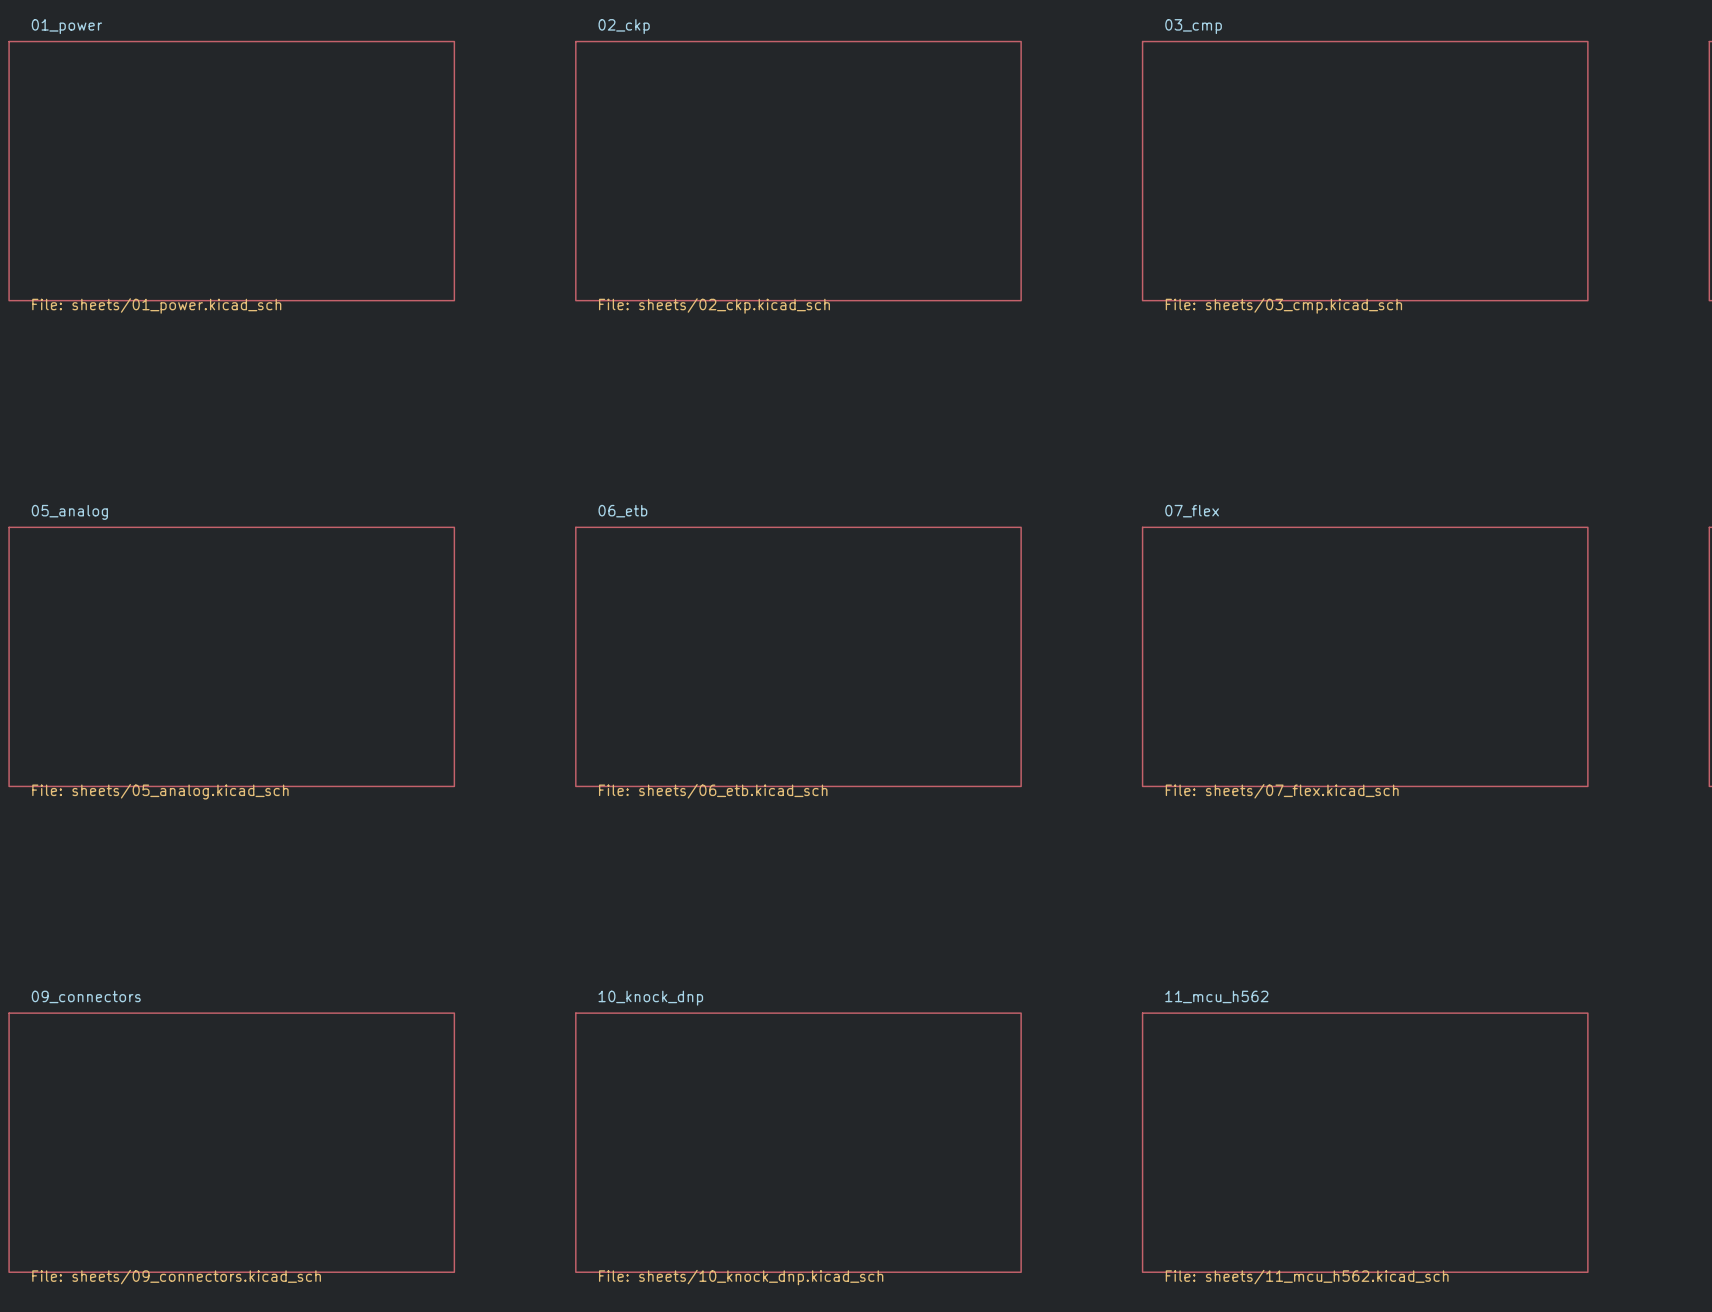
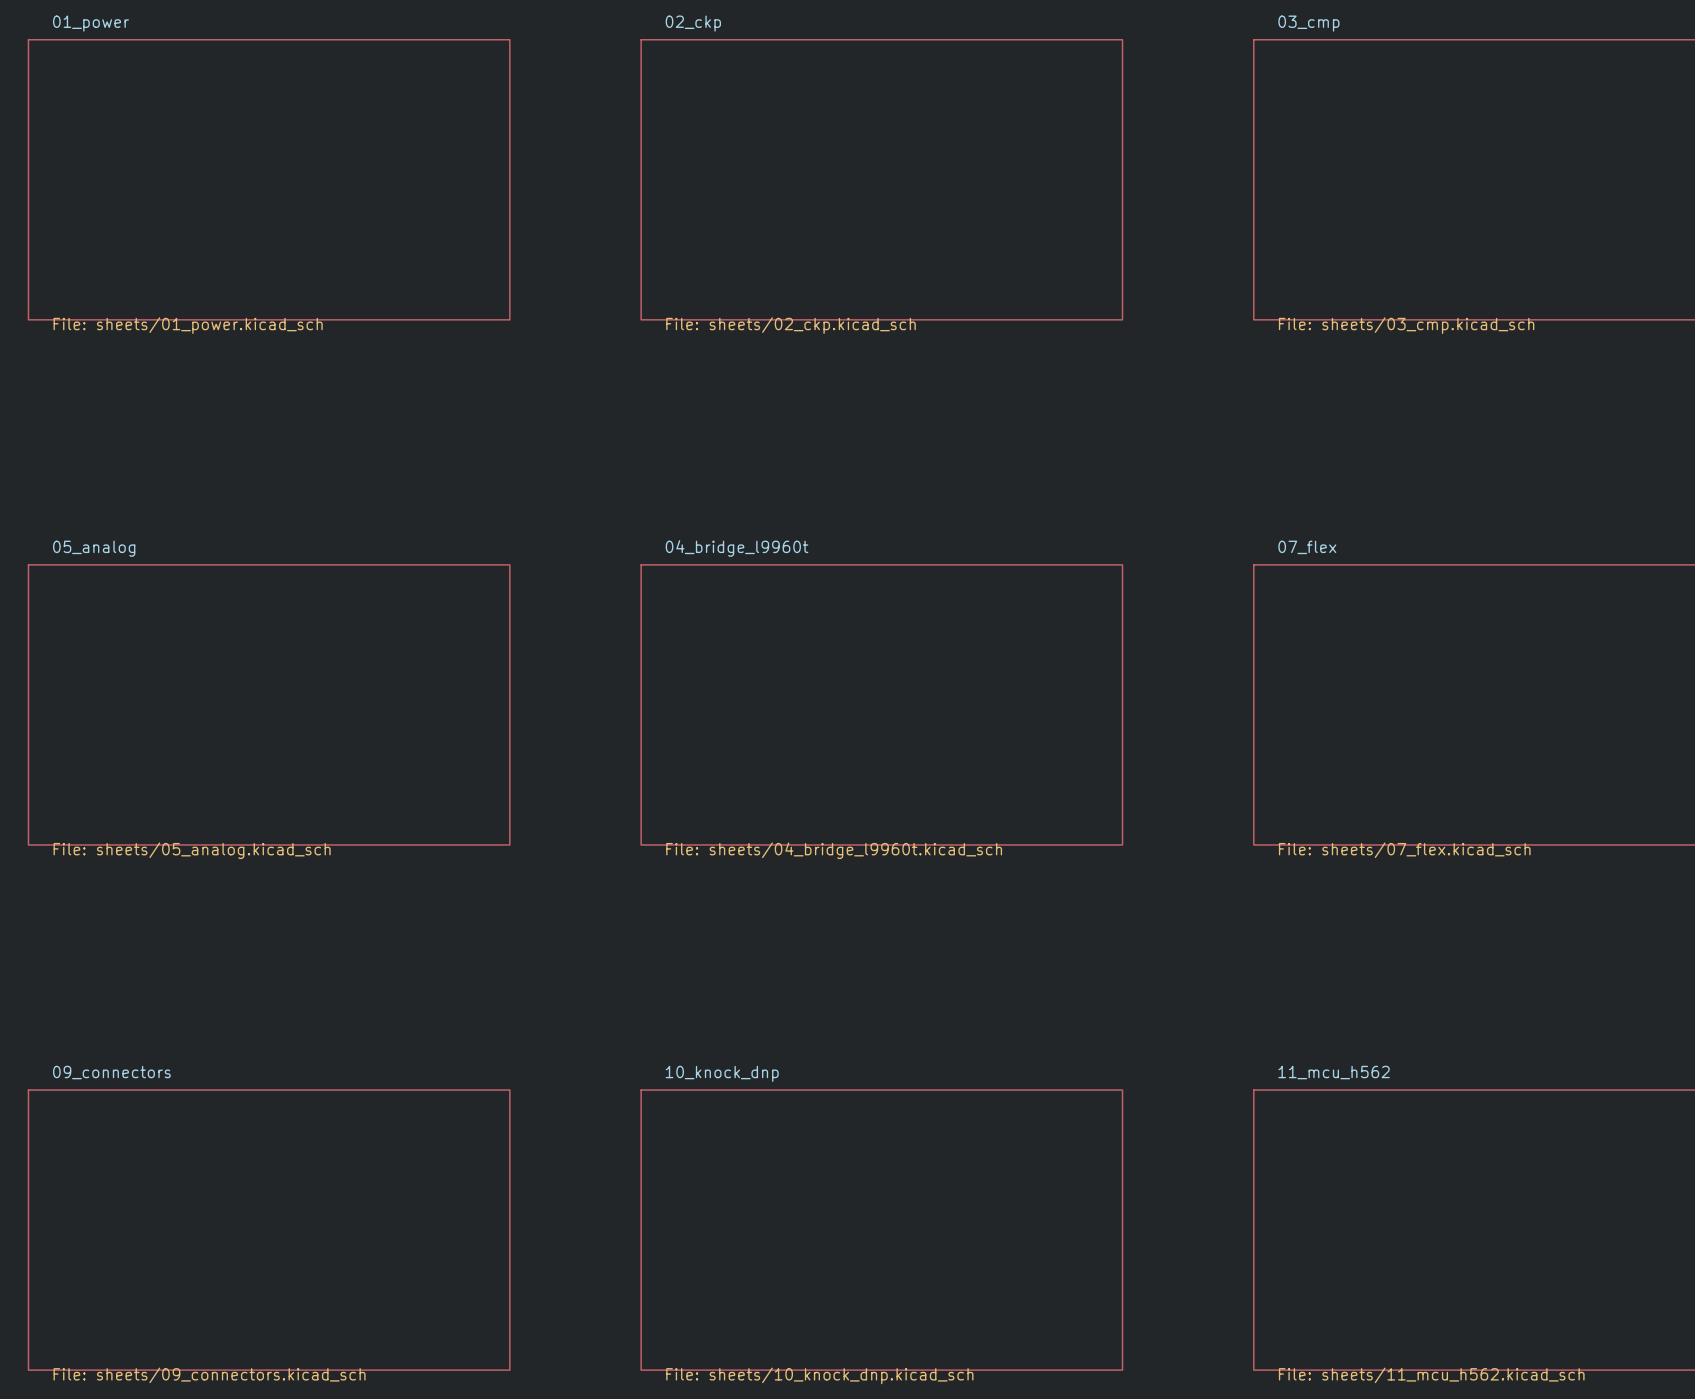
sheet 06_etb name: 06_etb (622, 511) -> 04_bridge_l9960t (737, 548)
sheet 06_etb value: File: sheets/06_etb.kicad_sch (713, 791) -> File: sheets/04_bridge_l9960t.kicad_sch (834, 850)

